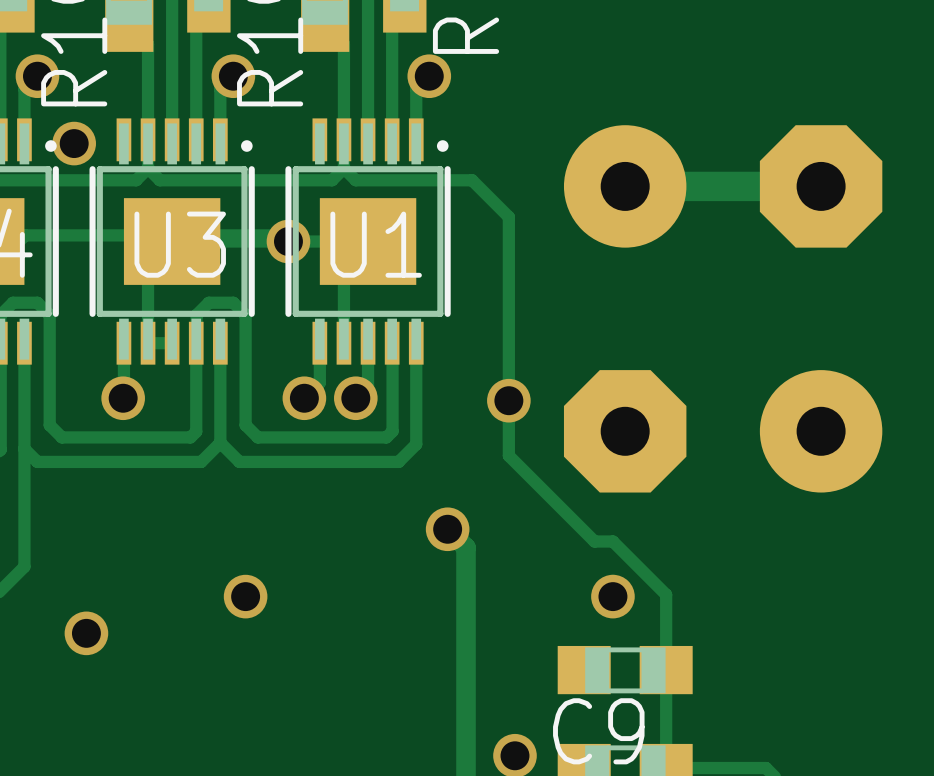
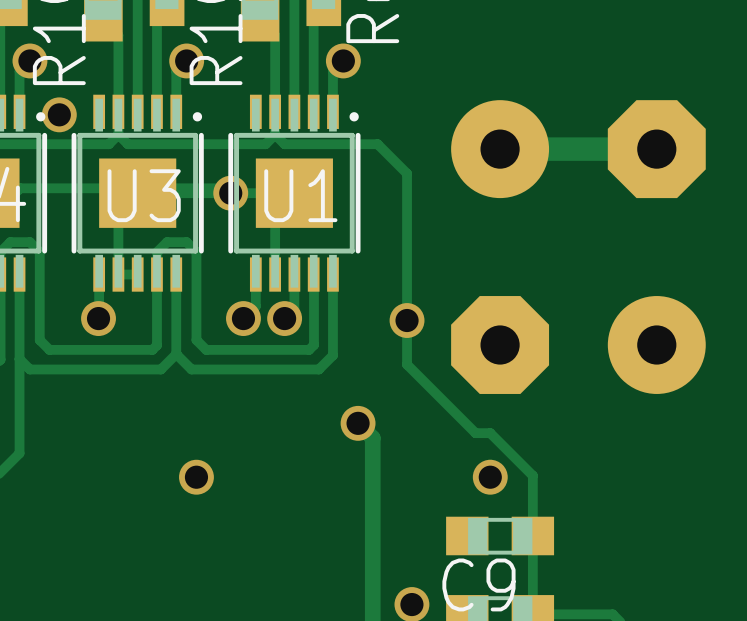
via: (86, 633) -> none

